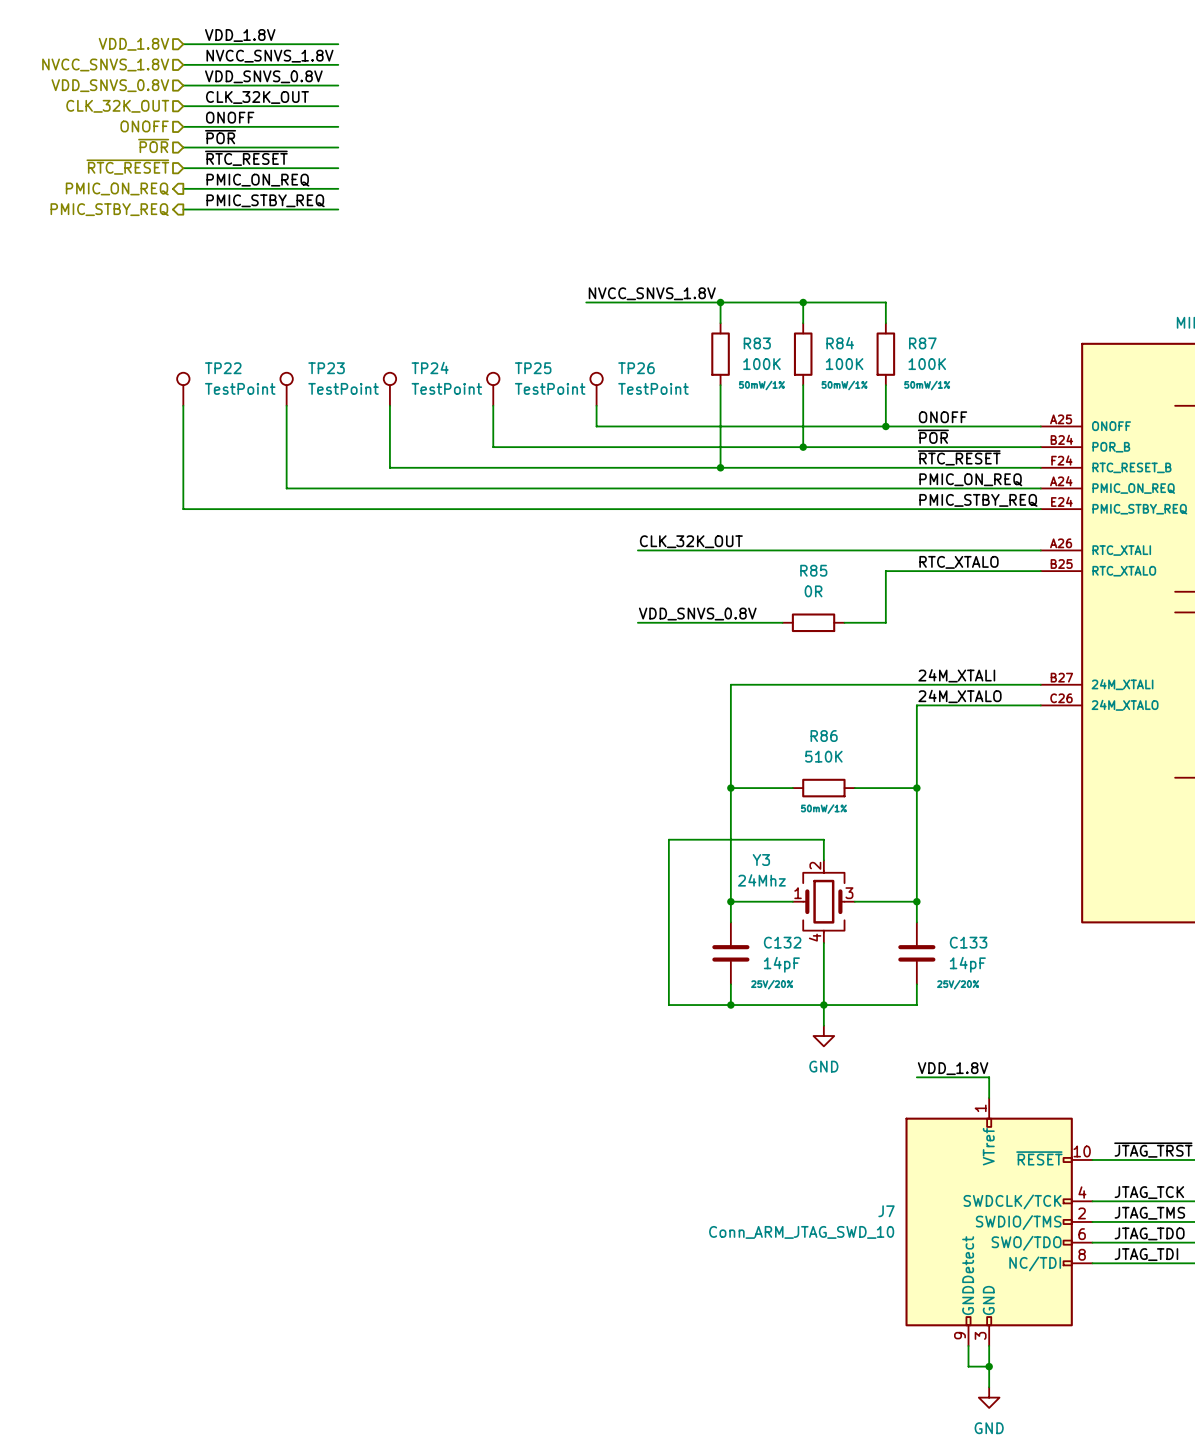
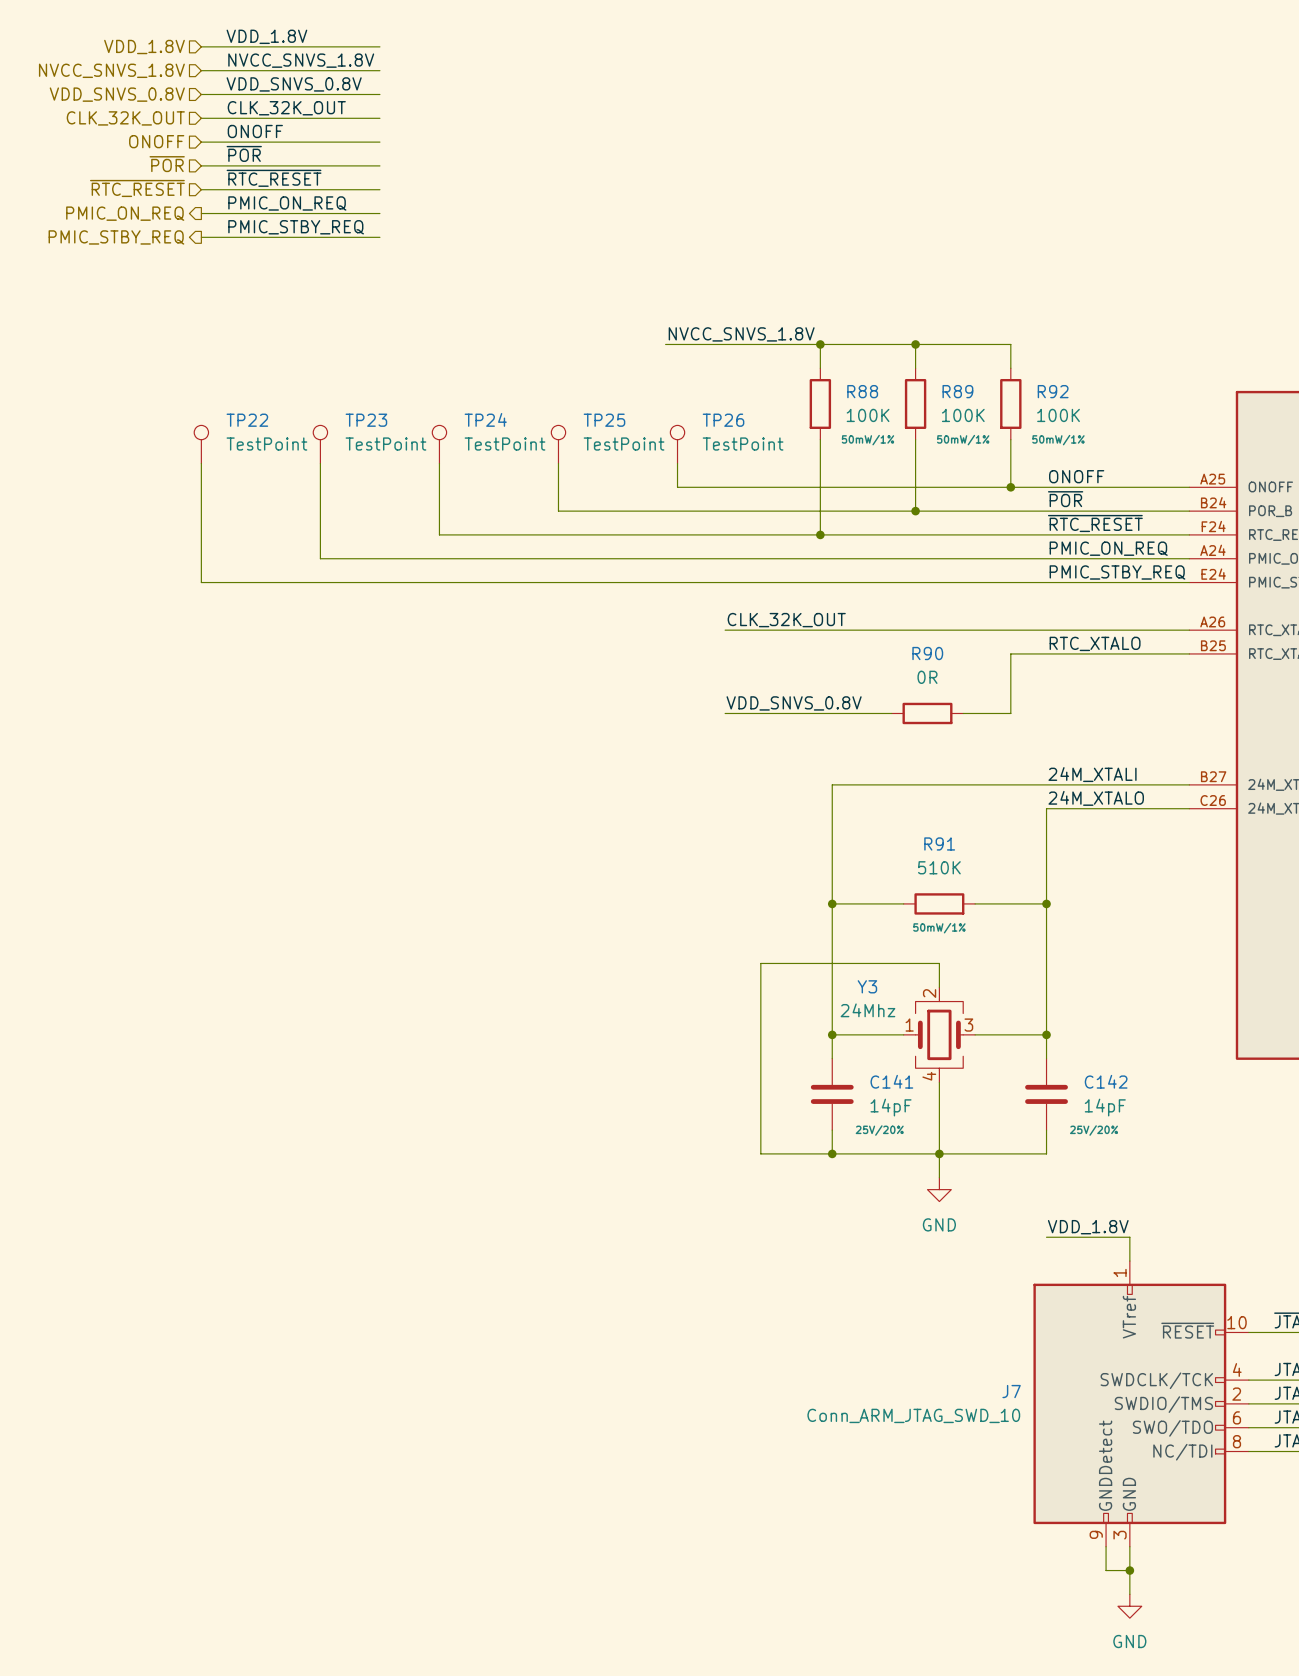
R83 name: R83 (757, 343) -> R88 (862, 391)
R84 name: R84 (840, 343) -> R89 (957, 391)
R87 name: R87 (922, 343) -> R92 (1053, 391)
R85 name: R85 (813, 570) -> R90 (927, 653)
R86 name: R86 (824, 736) -> R91 (939, 843)
C132 name: C132 (782, 942) -> C141 (891, 1081)
C133 name: C133 (968, 942) -> C142 (1106, 1081)

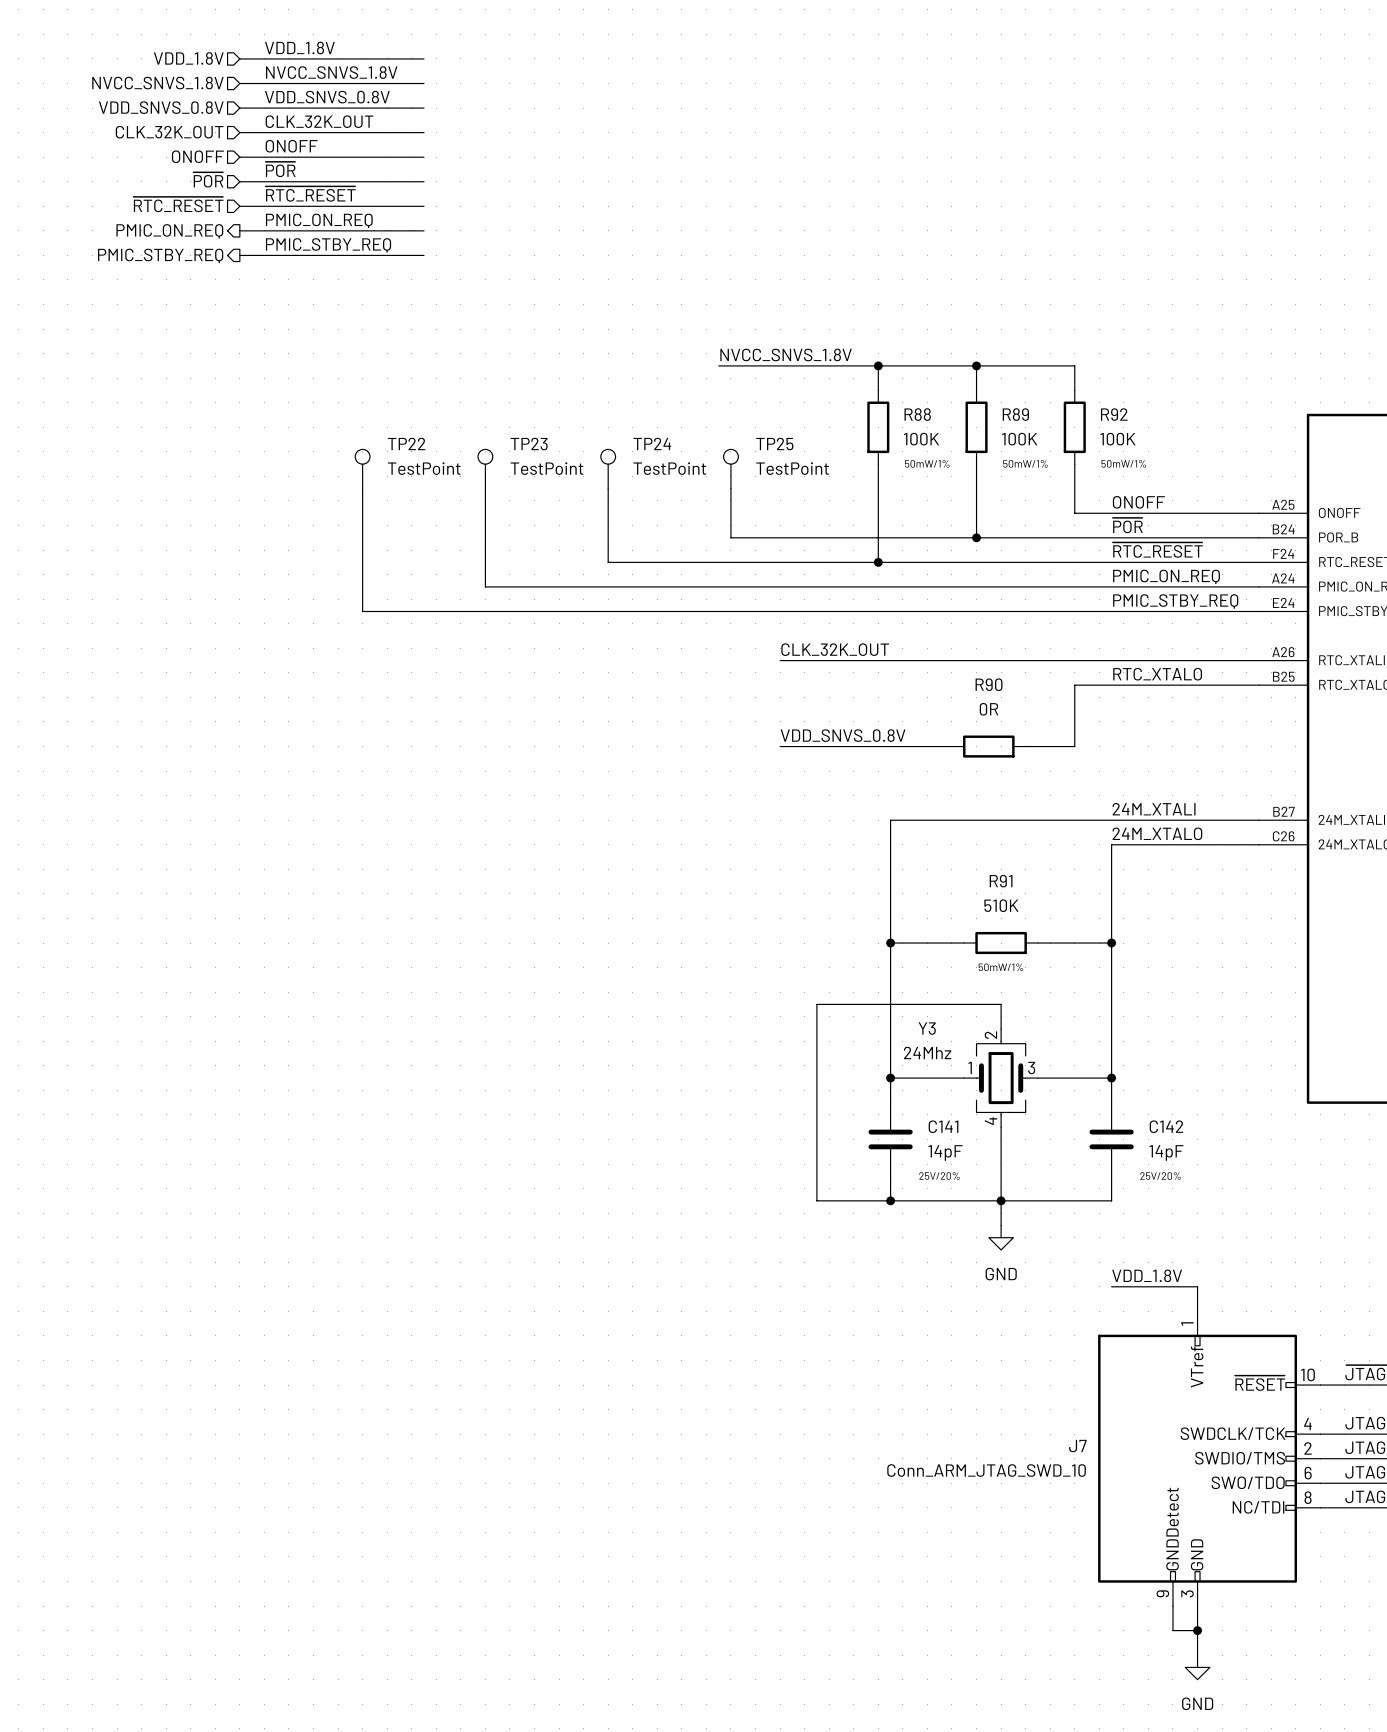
TP24 name: TP24 (485, 419) -> TP23 (529, 444)
TP23 name: TP23 (366, 420) -> TP22 (406, 443)
TP25 name: TP25 (604, 420) -> TP24 (652, 443)
TP26 name: TP26 (723, 420) -> TP25 (774, 444)
TP22: TestPoint (201, 444) -> none
wire: (201, 463) (201, 582) (320, 582) -> none
wire: (677, 487) (1010, 487) -> none
junction: (1010, 487) -> none
wire: (558, 511) (677, 511) -> (730, 513) (730, 537)
wire: (439, 534) (558, 534) -> (608, 537) (608, 562)
wire: none -> (485, 562) (485, 586)
wire: (320, 558) (439, 558) -> (362, 586) (362, 611)

